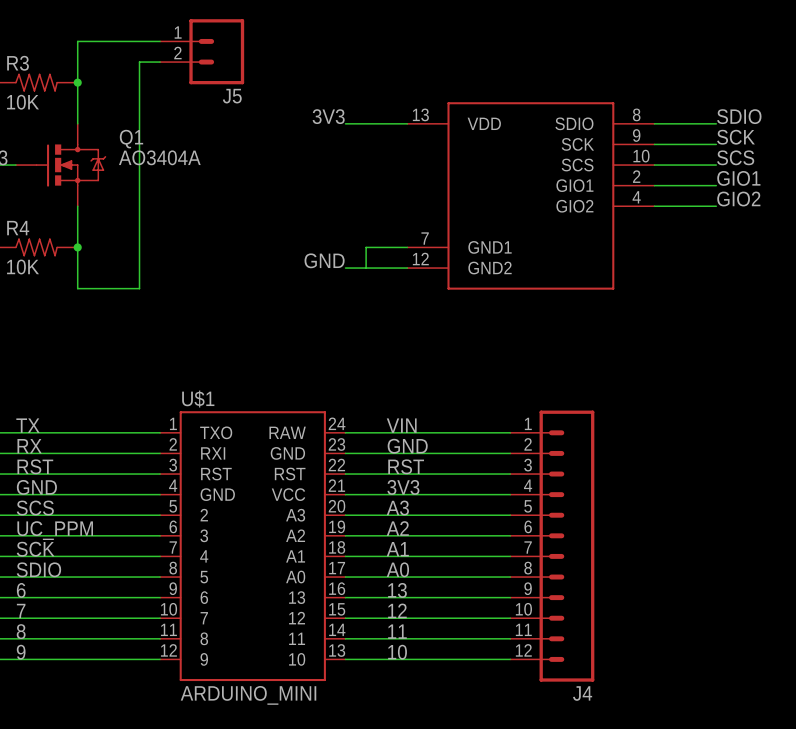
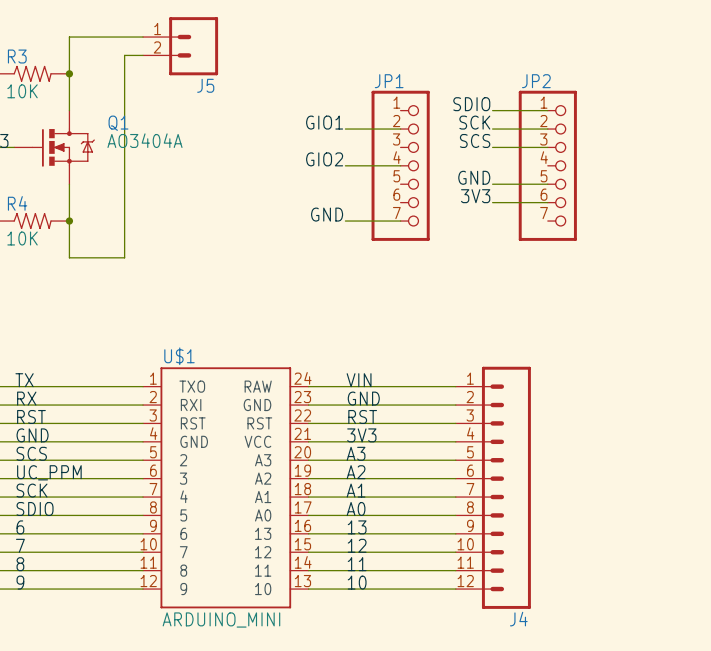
label: 3V3 (328, 116) -> none
label position: SDIO (739, 116) -> SDIO (471, 104)
wire: (345, 123) (407, 123) -> (345, 129) (400, 129)
wire: (654, 123) (716, 123) -> (492, 110) (547, 110)
label: none -> GIO1 (324, 122)
label position: SCK (736, 137) -> SCK (474, 122)
wire: (654, 144) (716, 144) -> (492, 129) (547, 129)
label position: SCS (735, 157) -> SCS (475, 140)
wire: (654, 165) (716, 165) -> (492, 147) (547, 147)
label: none -> GIO2 (324, 159)
label: GIO1 (738, 178) -> none
JP1: none -> (400, 165)
JP2: none -> (547, 165)
wire: (654, 185) (716, 185) -> (492, 202) (547, 202)
part: (530, 195) -> none
label: none -> GND (474, 177)
label: GIO2 (738, 199) -> none
wire: (654, 206) (716, 206) -> (492, 184) (547, 184)
label: none -> 3V3 (475, 196)
wire: (386, 247) (366, 247) (366, 268) -> none
label position: GND (324, 260) -> GND (327, 214)
wire: (345, 268) (407, 268) -> (345, 165) (400, 165)

